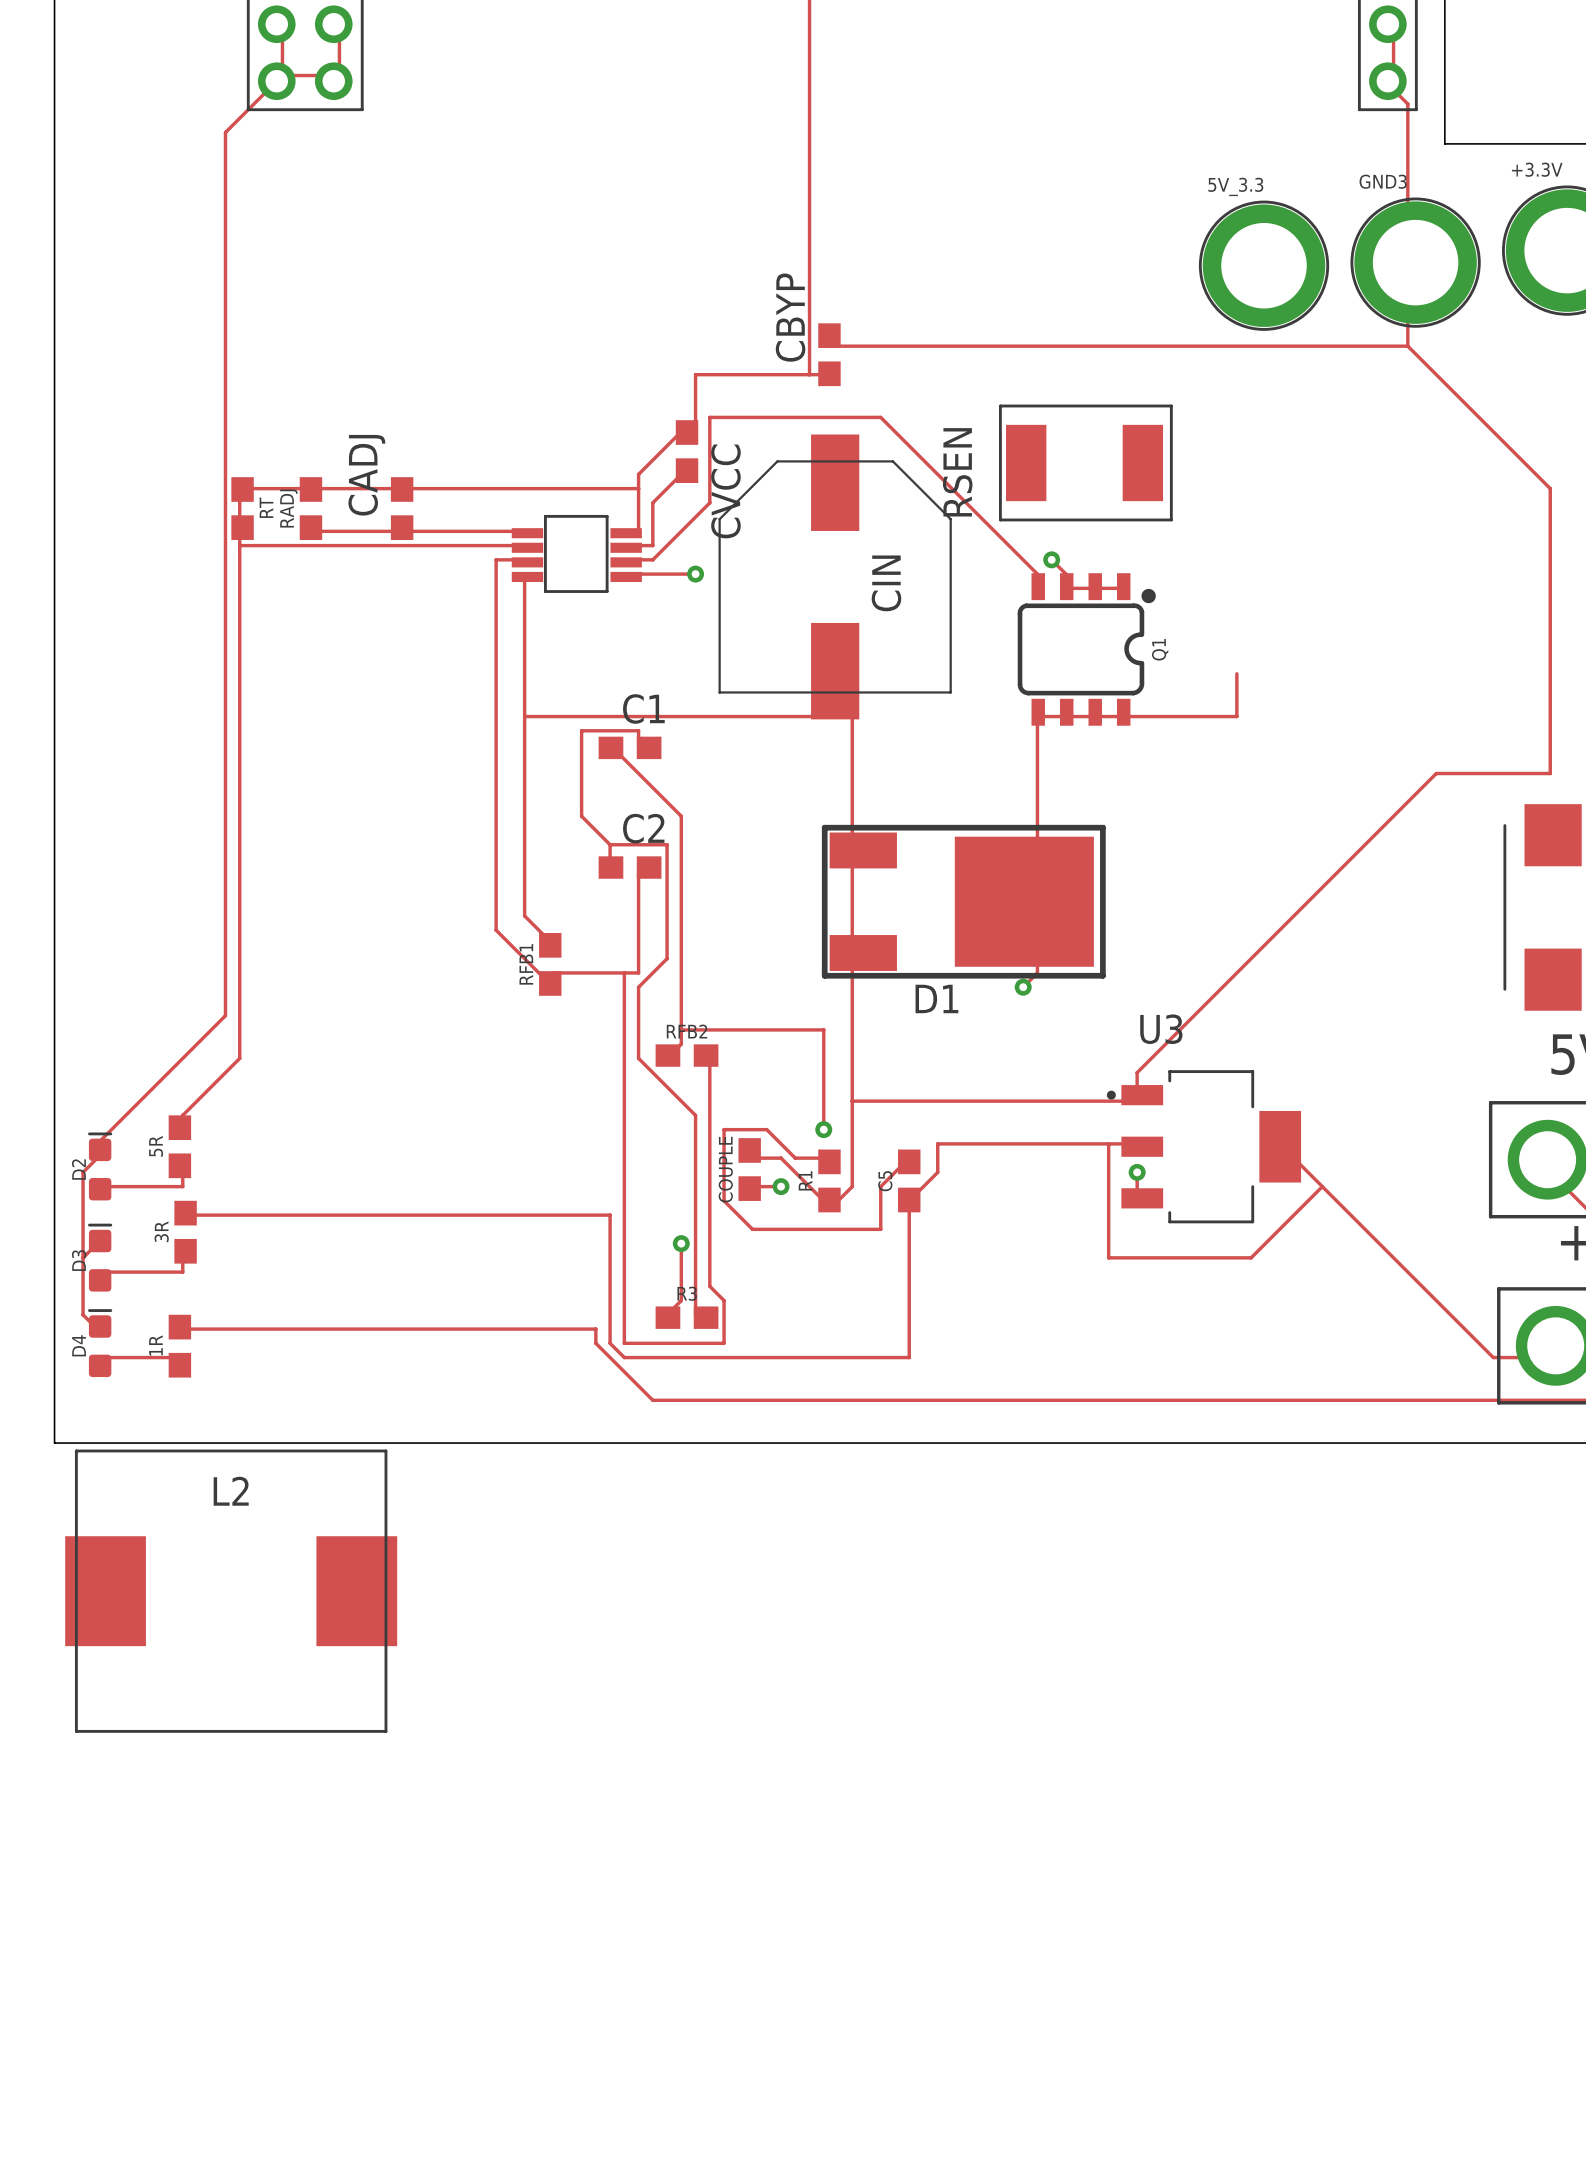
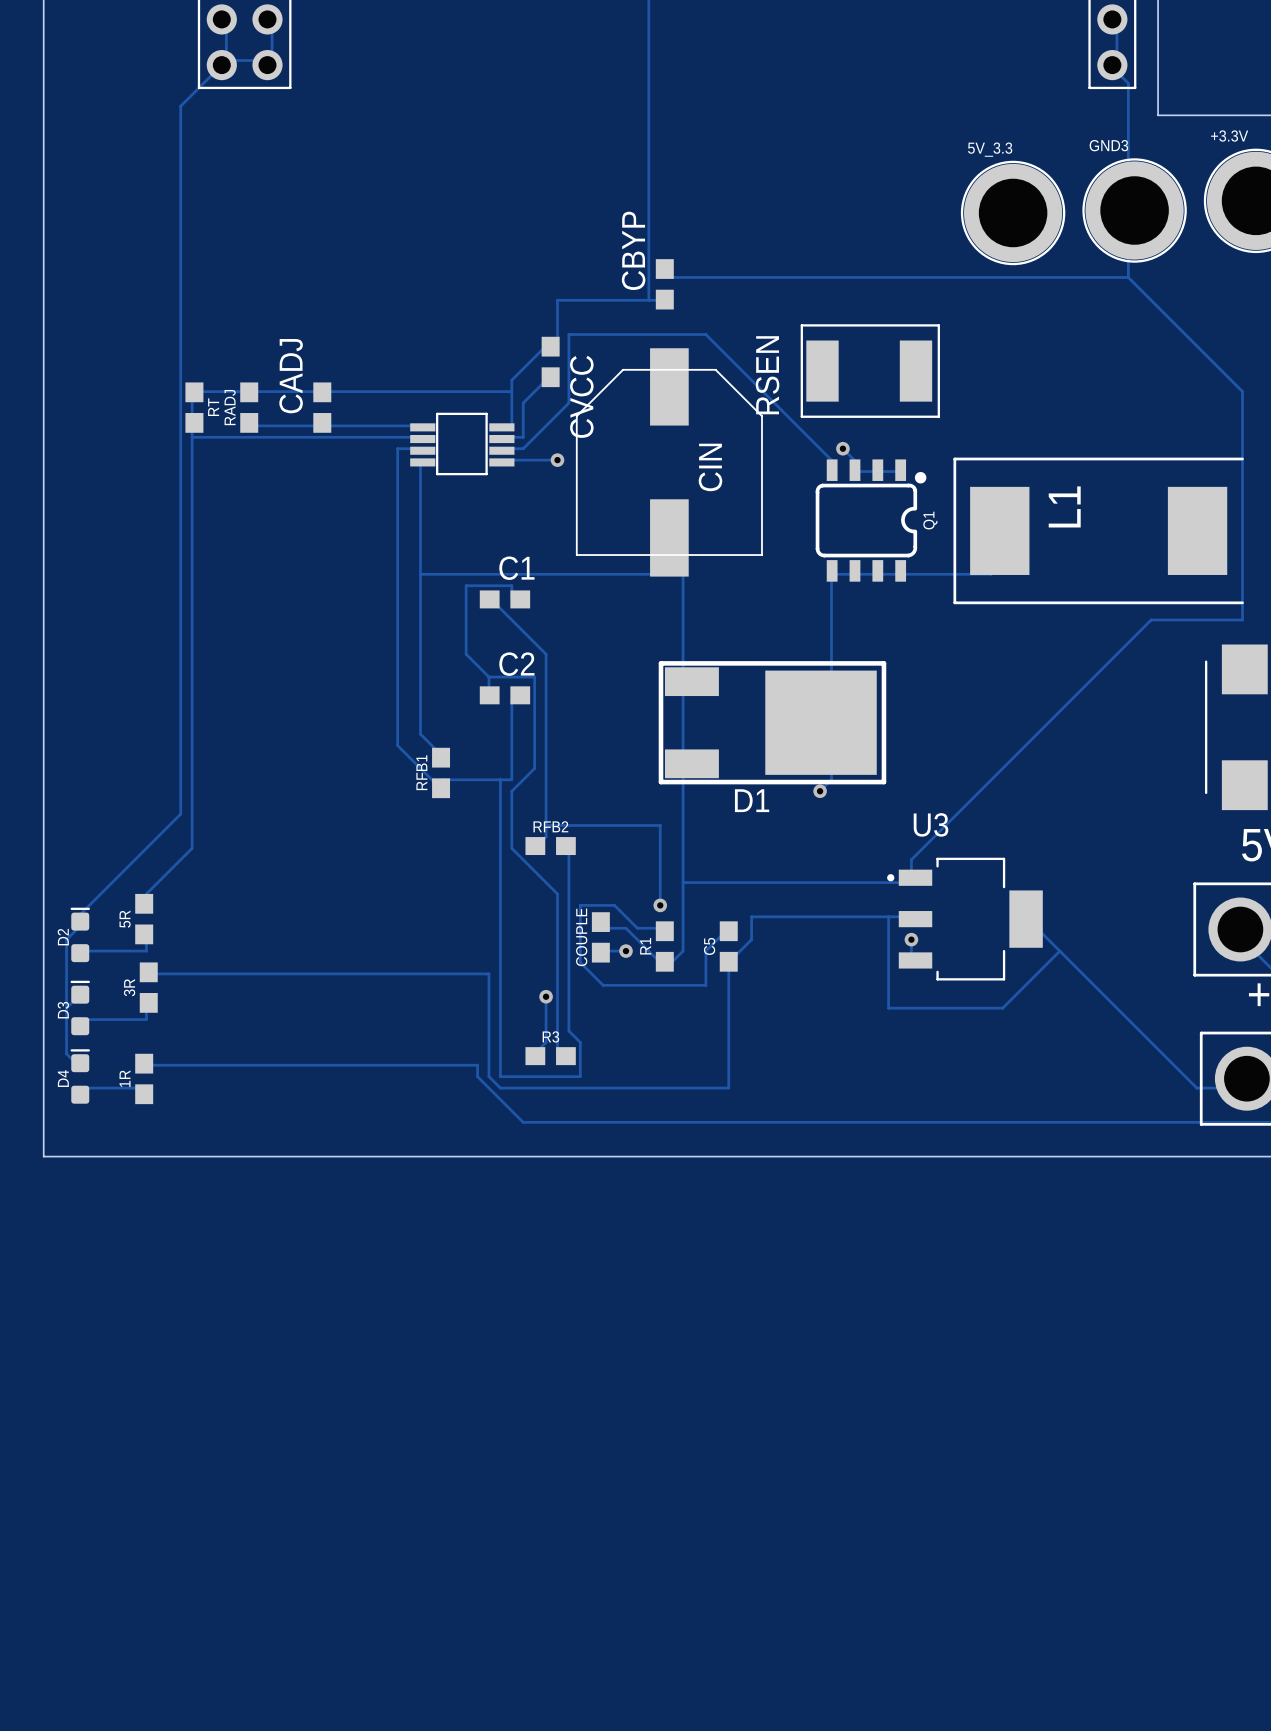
L1: none -> (1098, 530)
L2: (231, 1591) -> none

